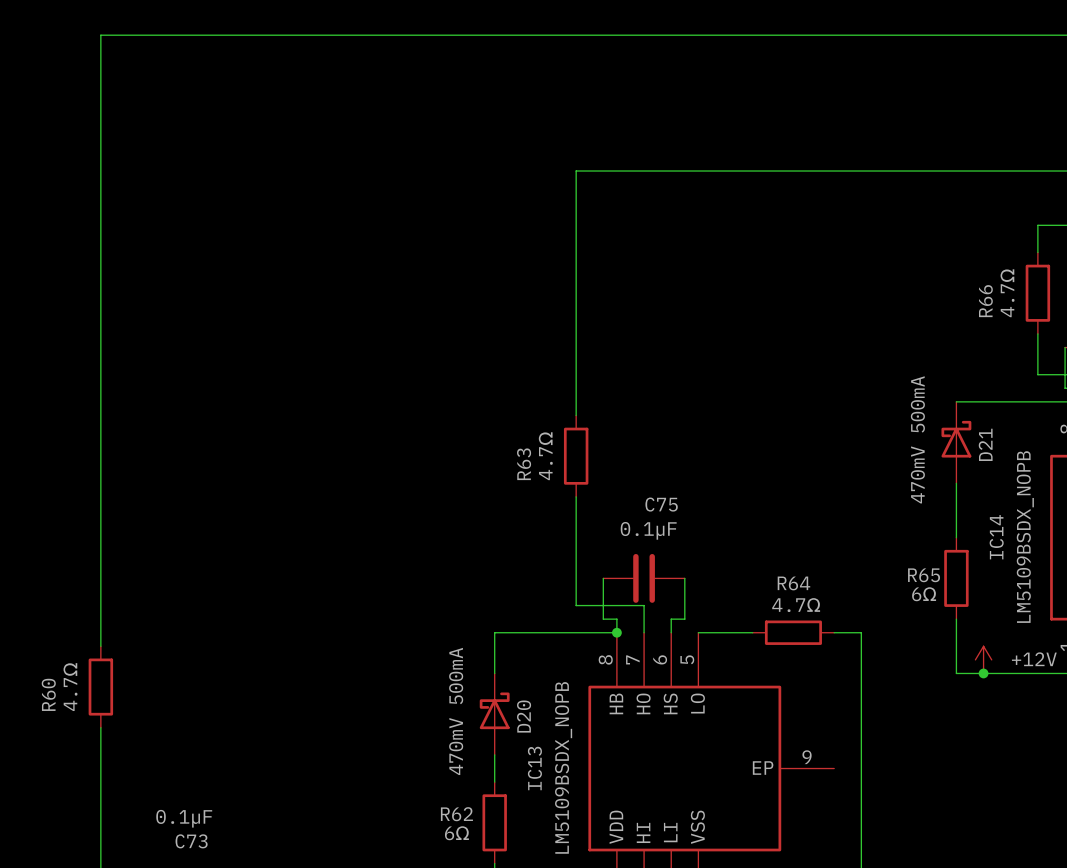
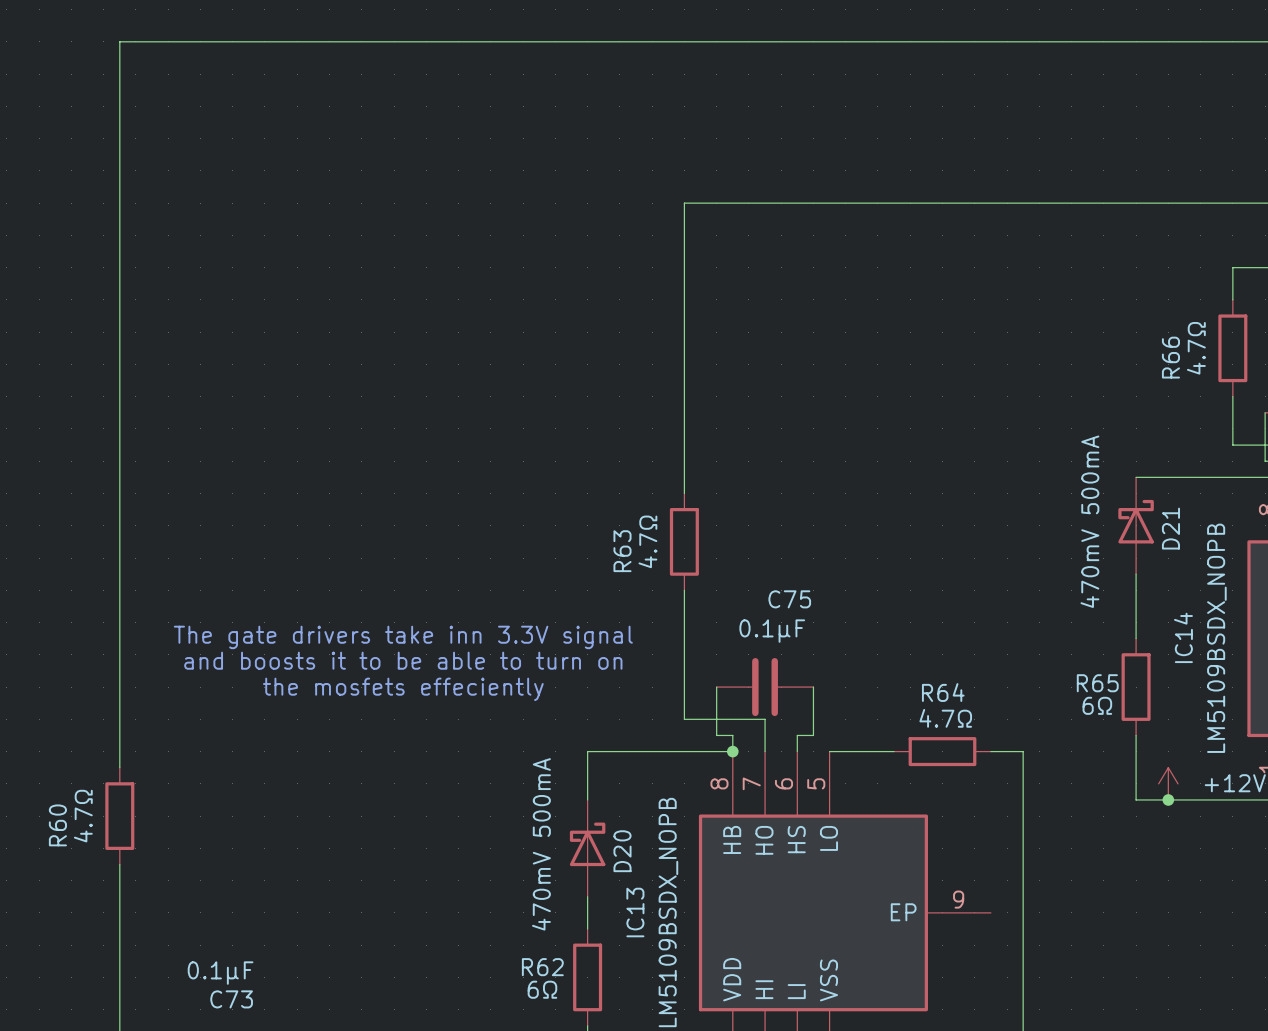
text: none -> The gate drivers take inn 3.3V signal (403, 637)
text: none -> and boosts it to be able to turn on (403, 660)
text: none -> the mosfets effeciently (403, 689)

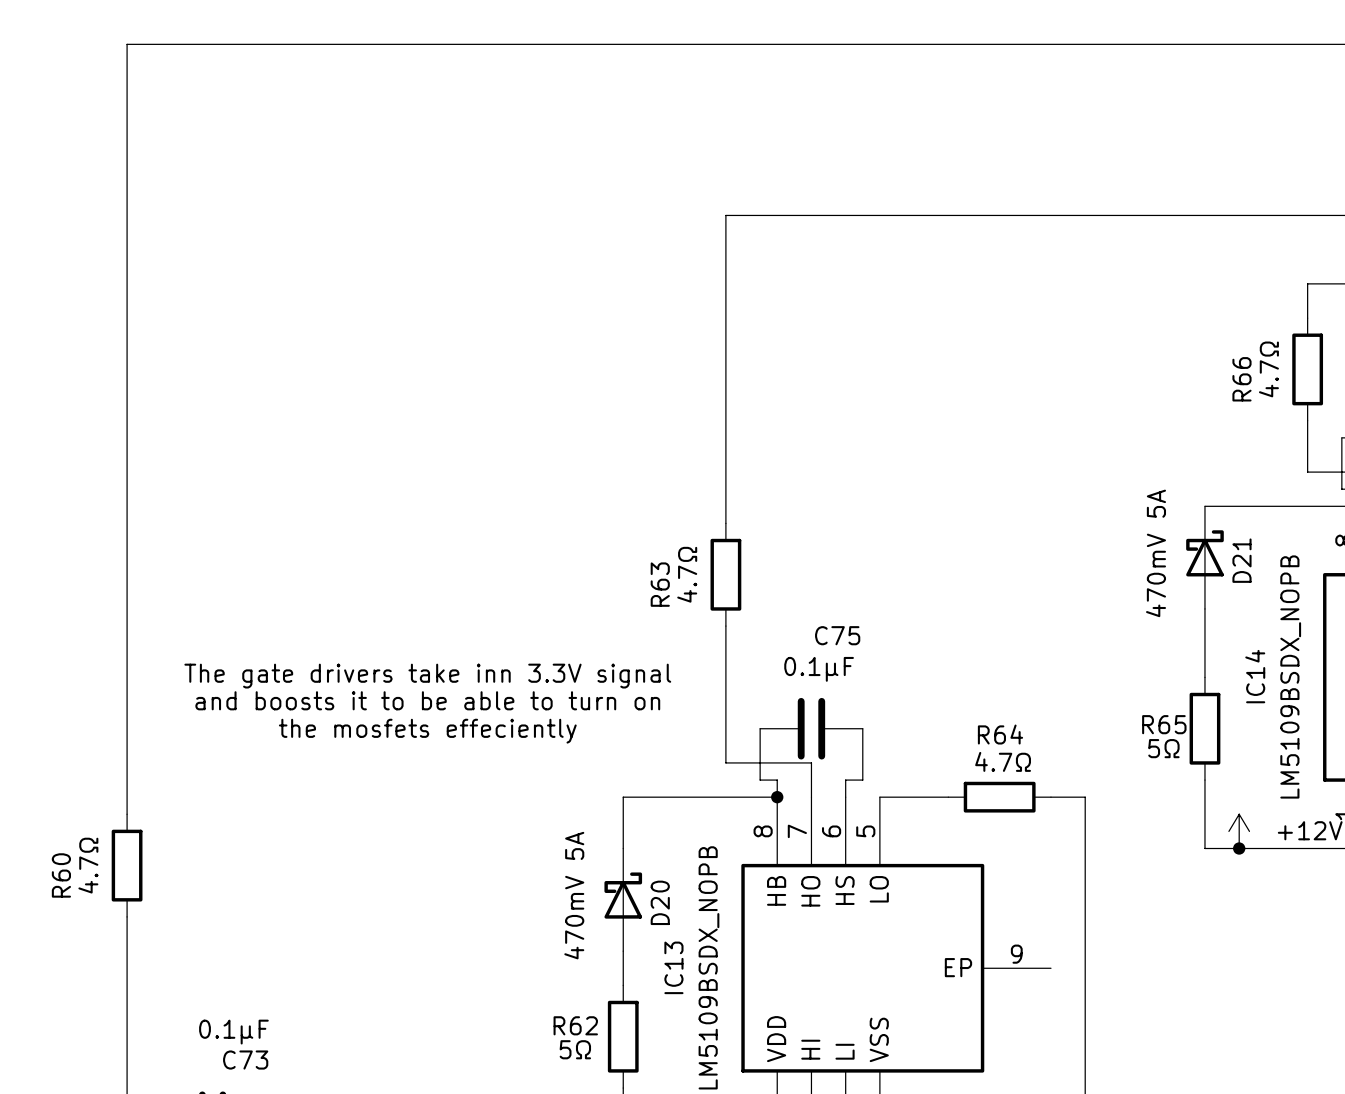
D21 value: 470mV 500mA (1089, 521) -> 470mV 5A (1156, 553)
R65 value: 6Ω (1097, 705) -> 5Ω (1163, 748)
D20 value: 470mV 500mA (541, 844) -> 470mV 5A (574, 895)
R62 value: 6Ω (542, 989) -> 5Ω (575, 1049)

